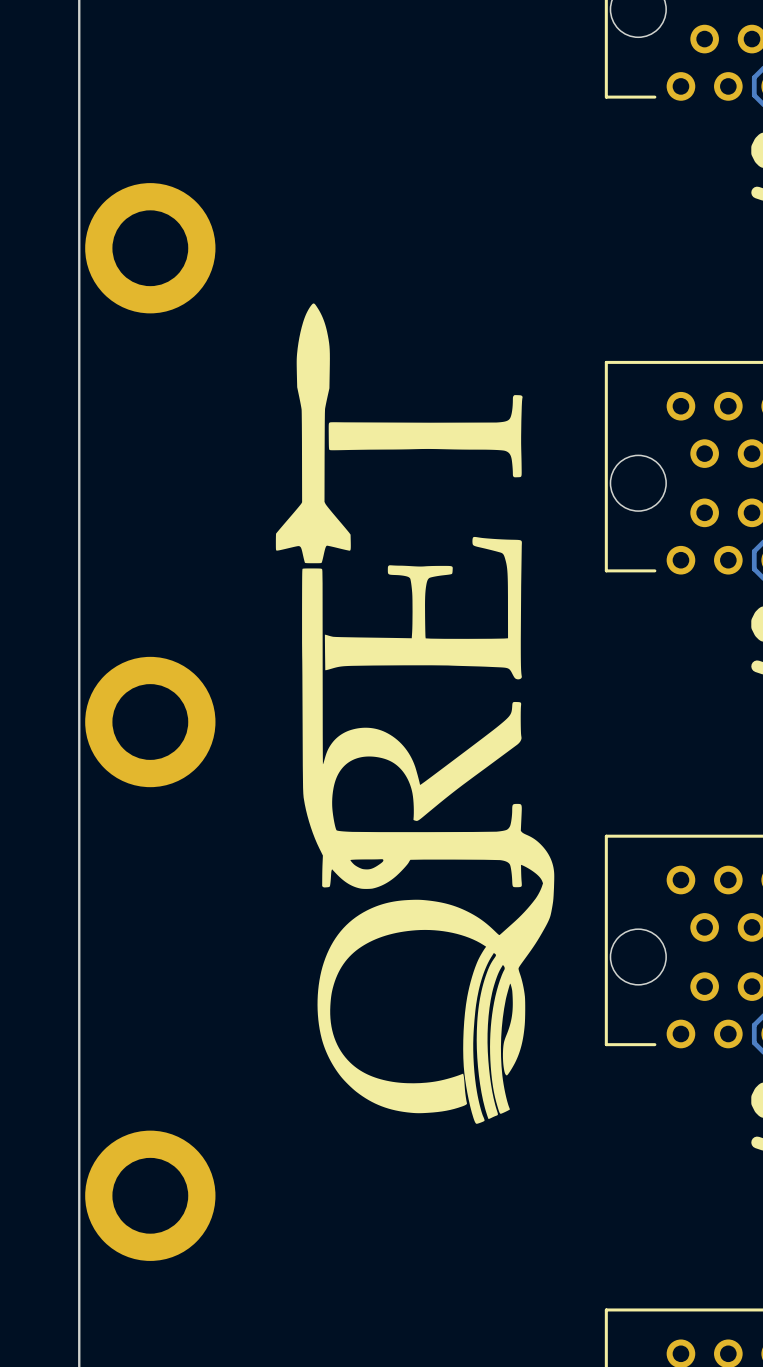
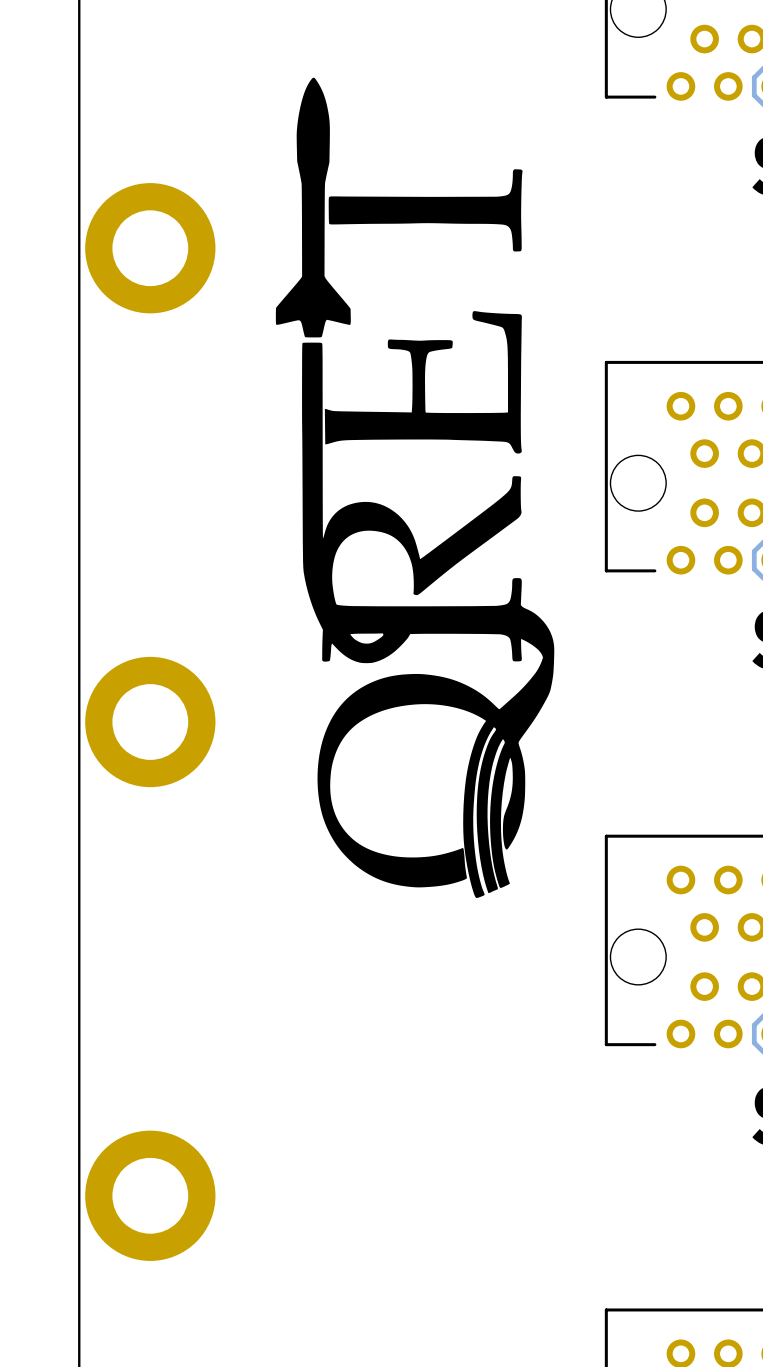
drawing position: (313, 433) -> (313, 207)
drawing position: (425, 436) -> (425, 210)
drawing position: (423, 608) -> (423, 382)
drawing position: (428, 846) -> (428, 620)

